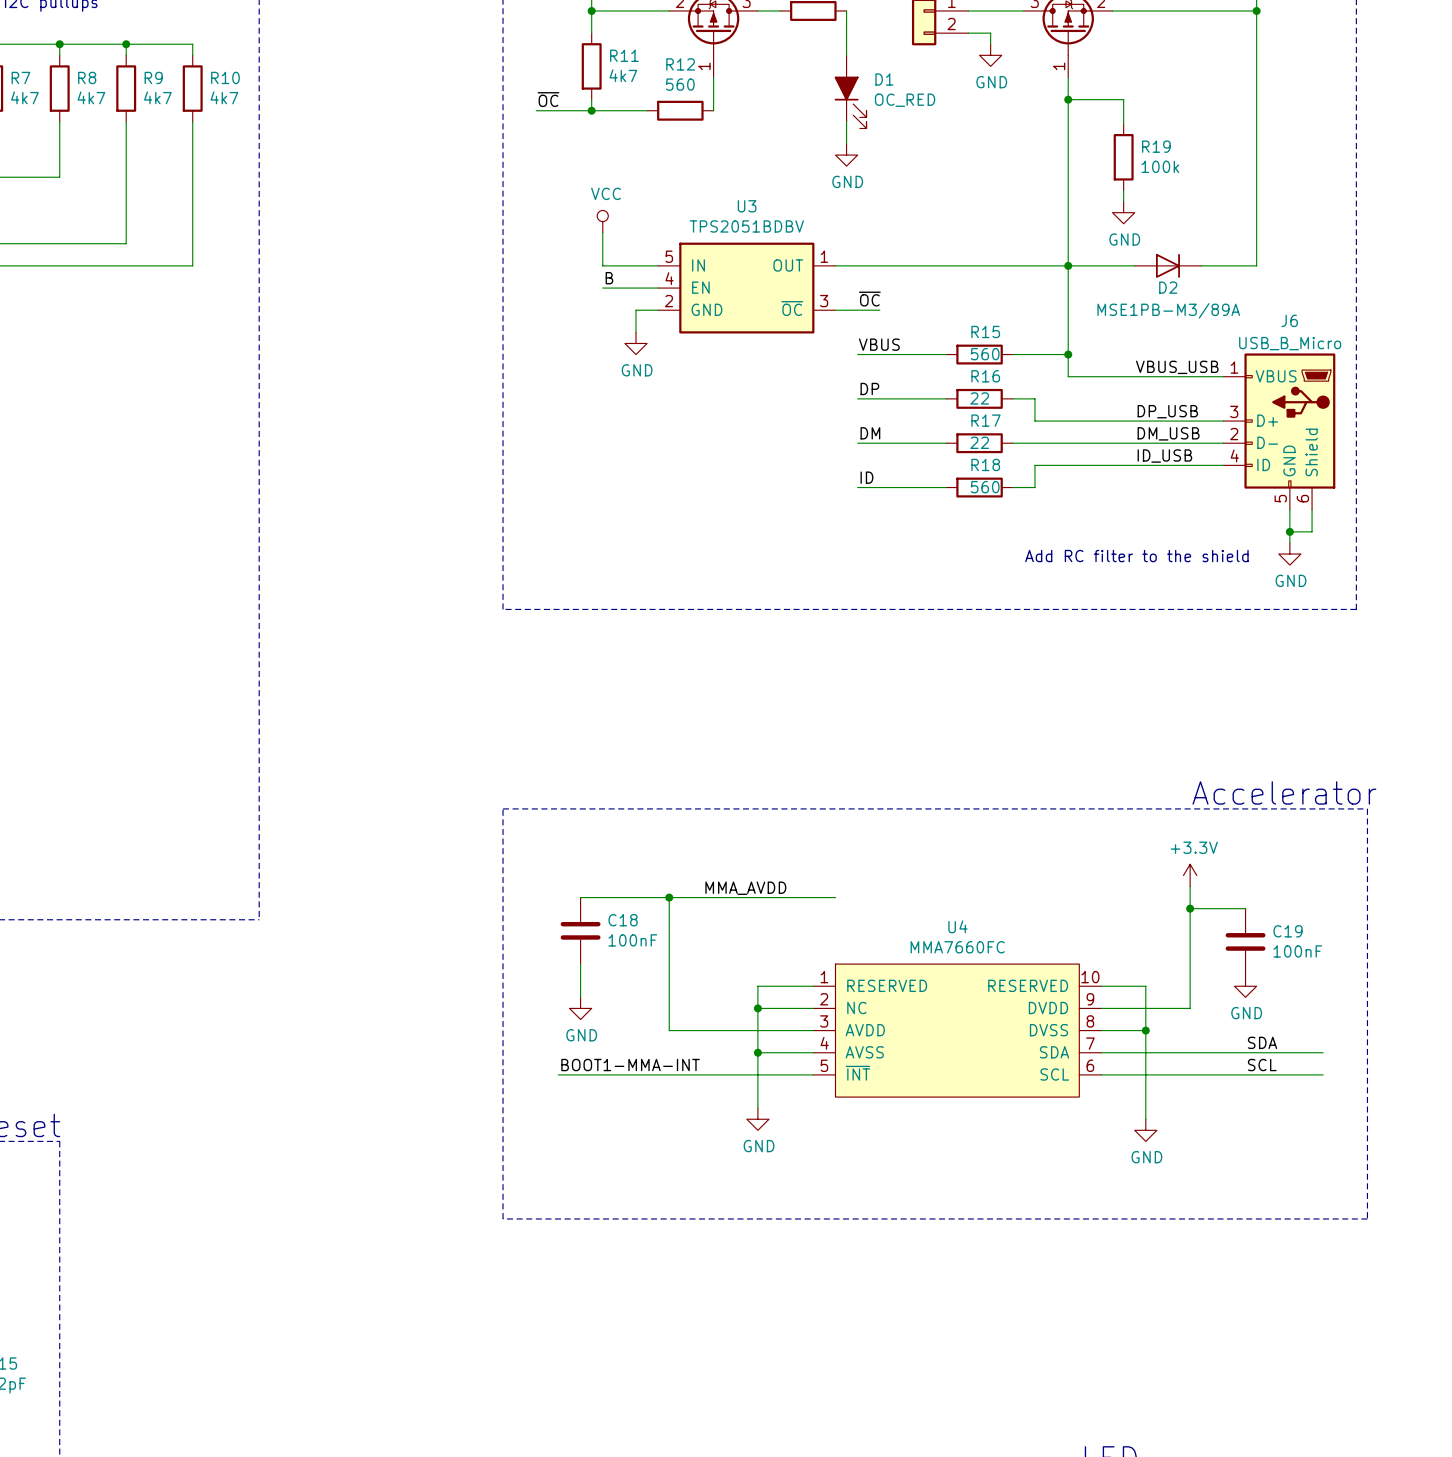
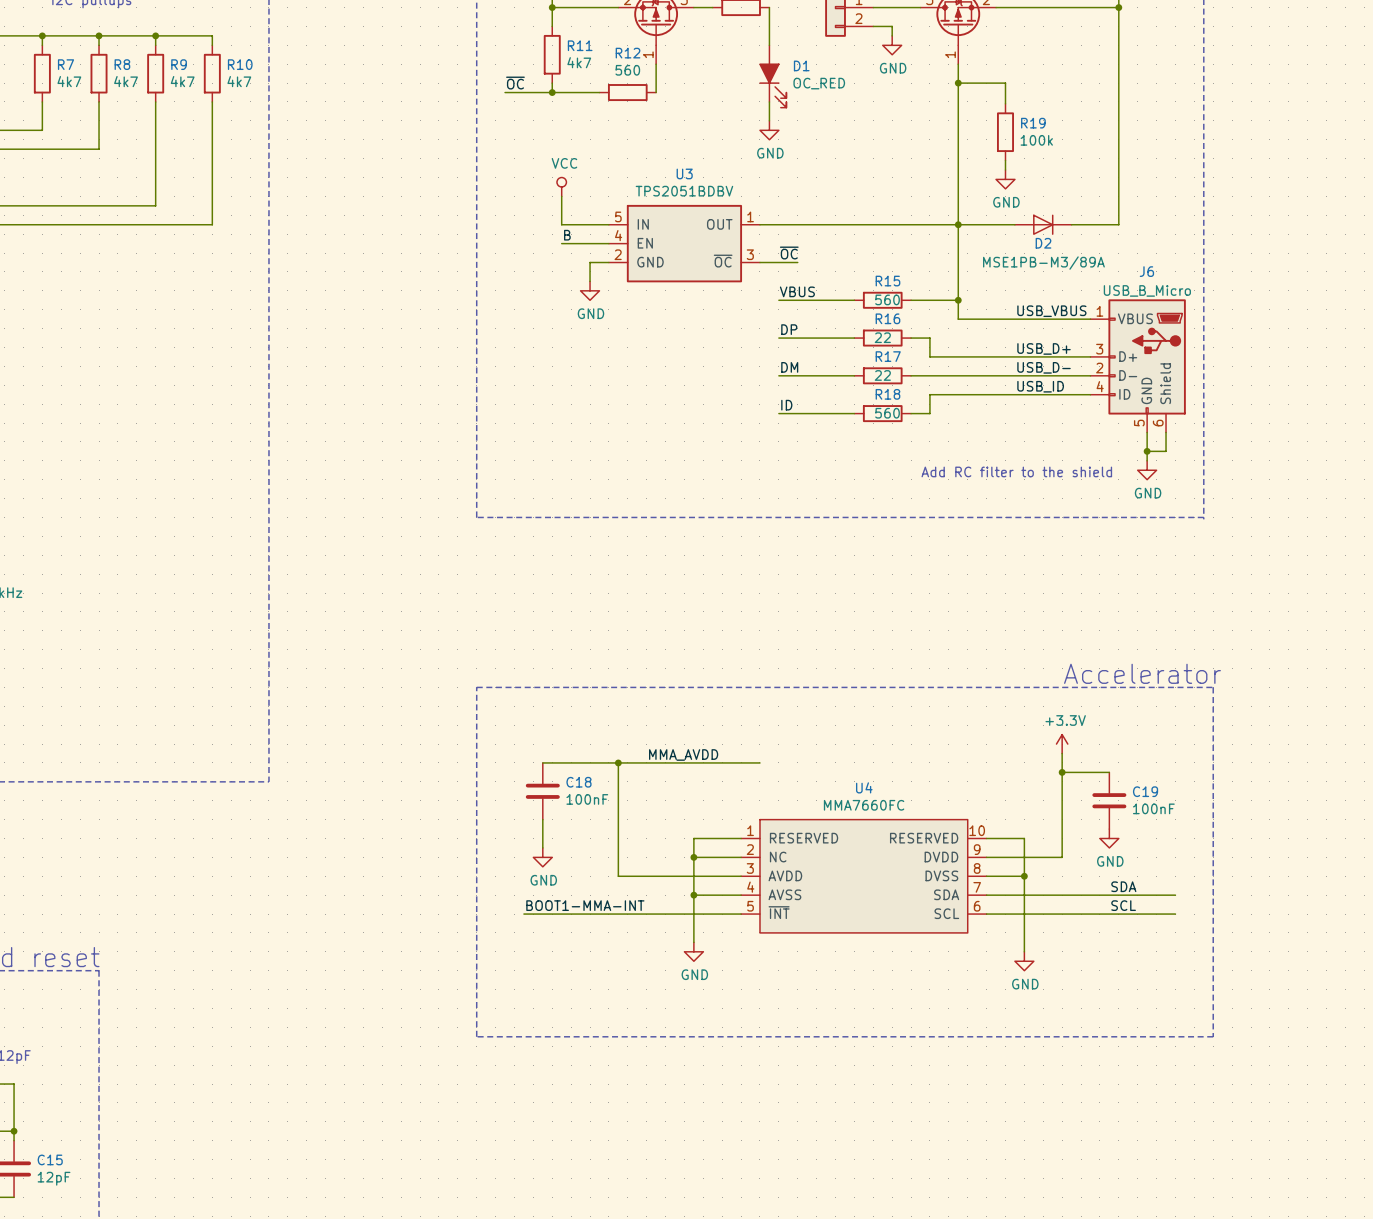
label: VBUS_USB (1177, 367) -> USB_VBUS (1051, 311)
label: DP_USB (1167, 411) -> USB_D+ (1044, 348)
label: DM_USB (1168, 433) -> USB_D- (1044, 367)
label: ID_USB (1164, 456) -> USB_ID (1040, 386)

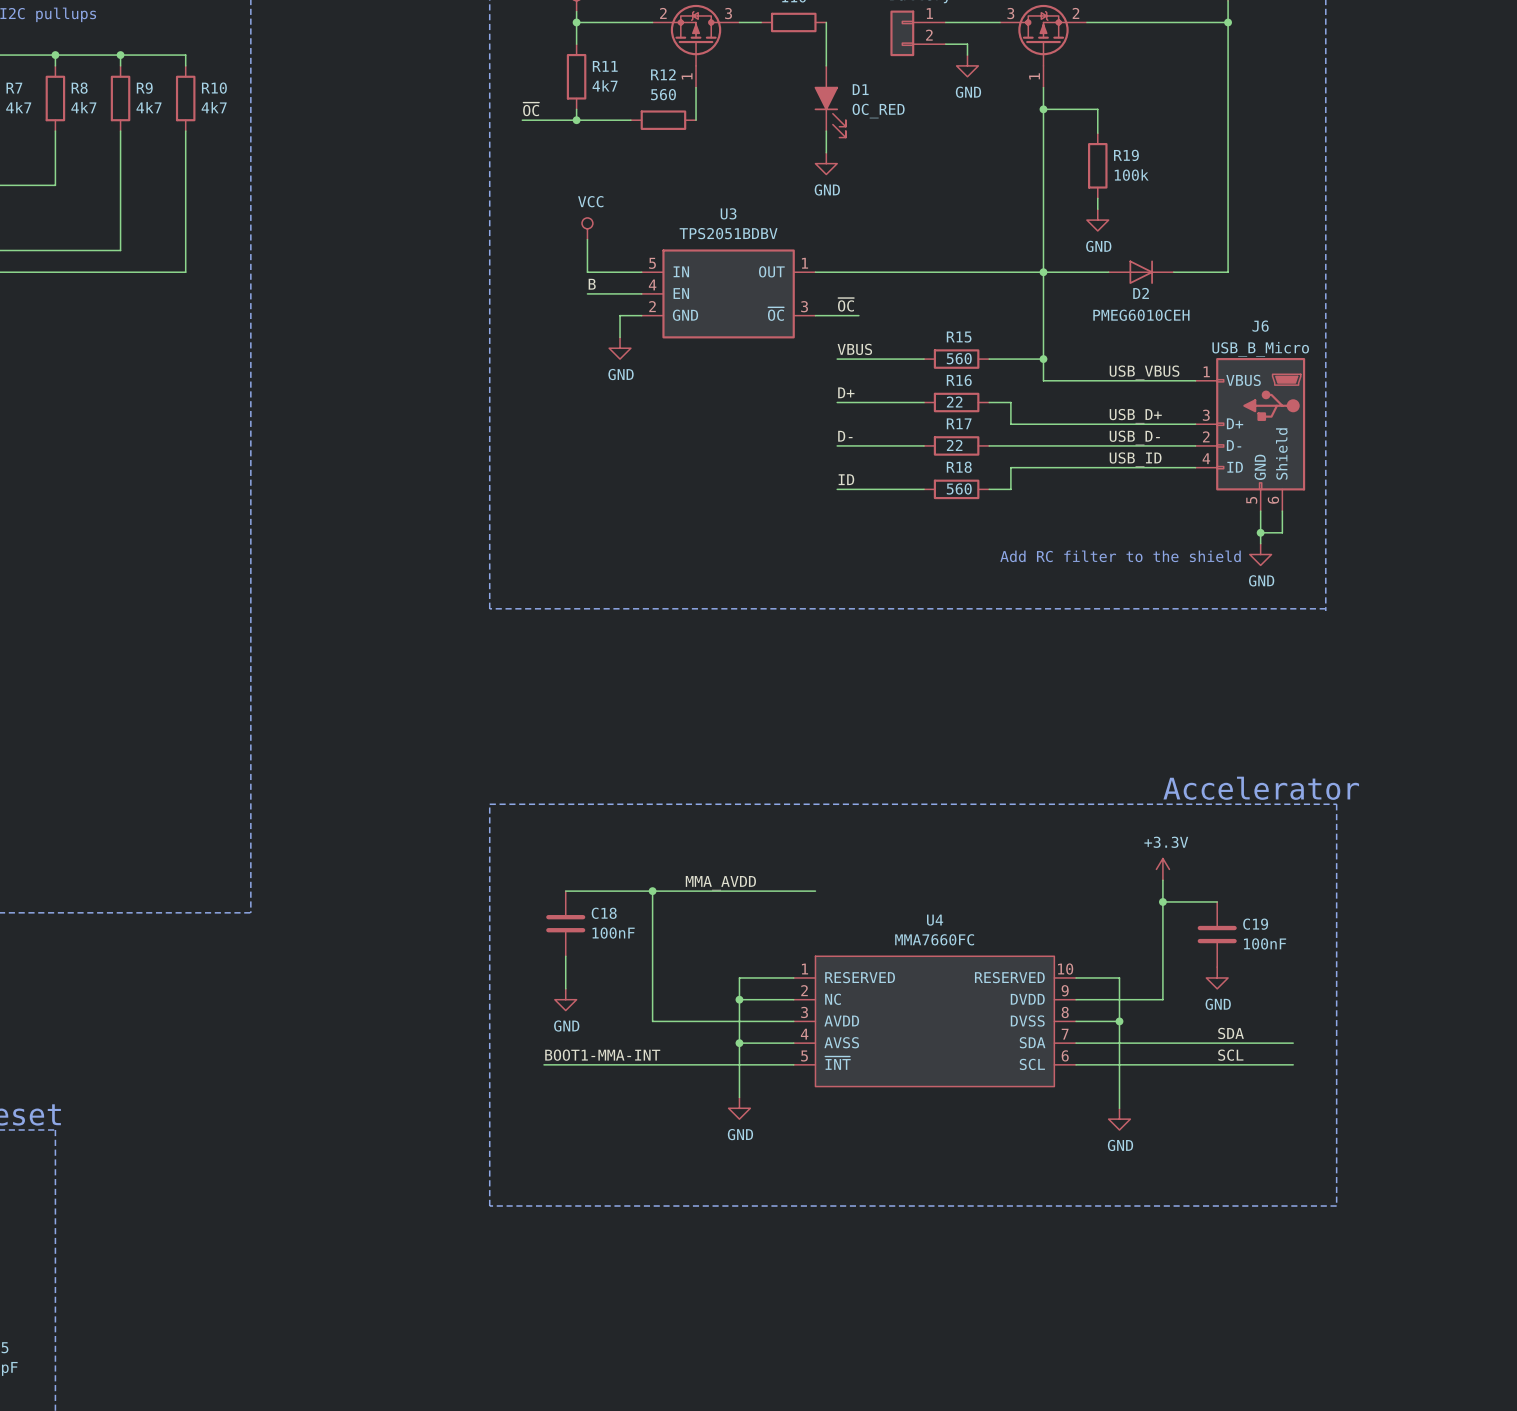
D2 value: MSE1PB-M3/89A (1043, 263) -> PMEG6010CEH (1141, 315)
label: DP (789, 329) -> D+ (846, 392)
label: DM (789, 367) -> D- (845, 436)

